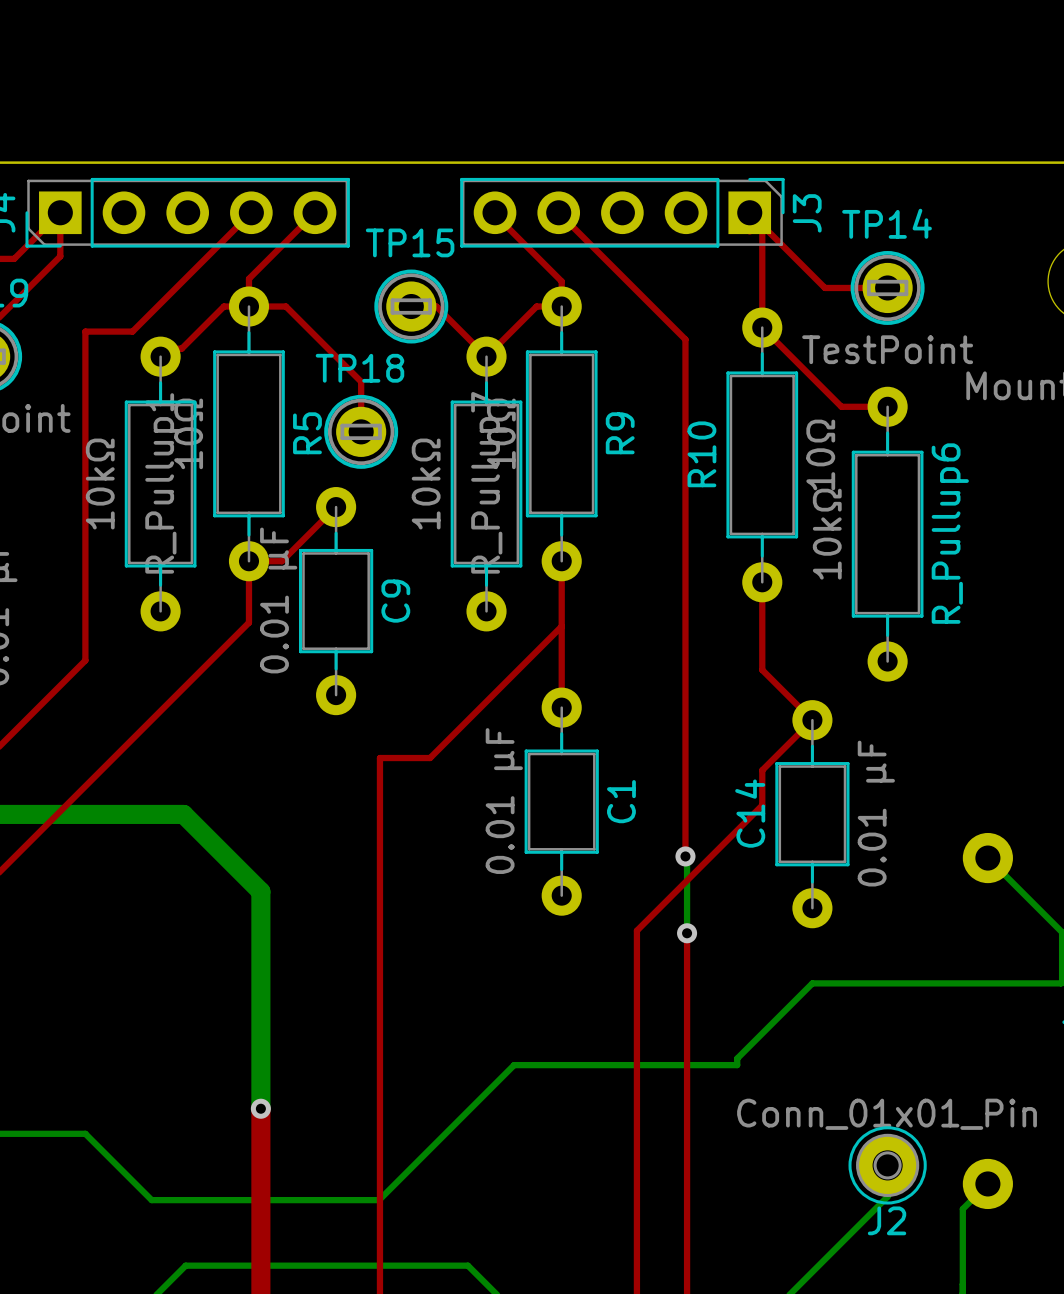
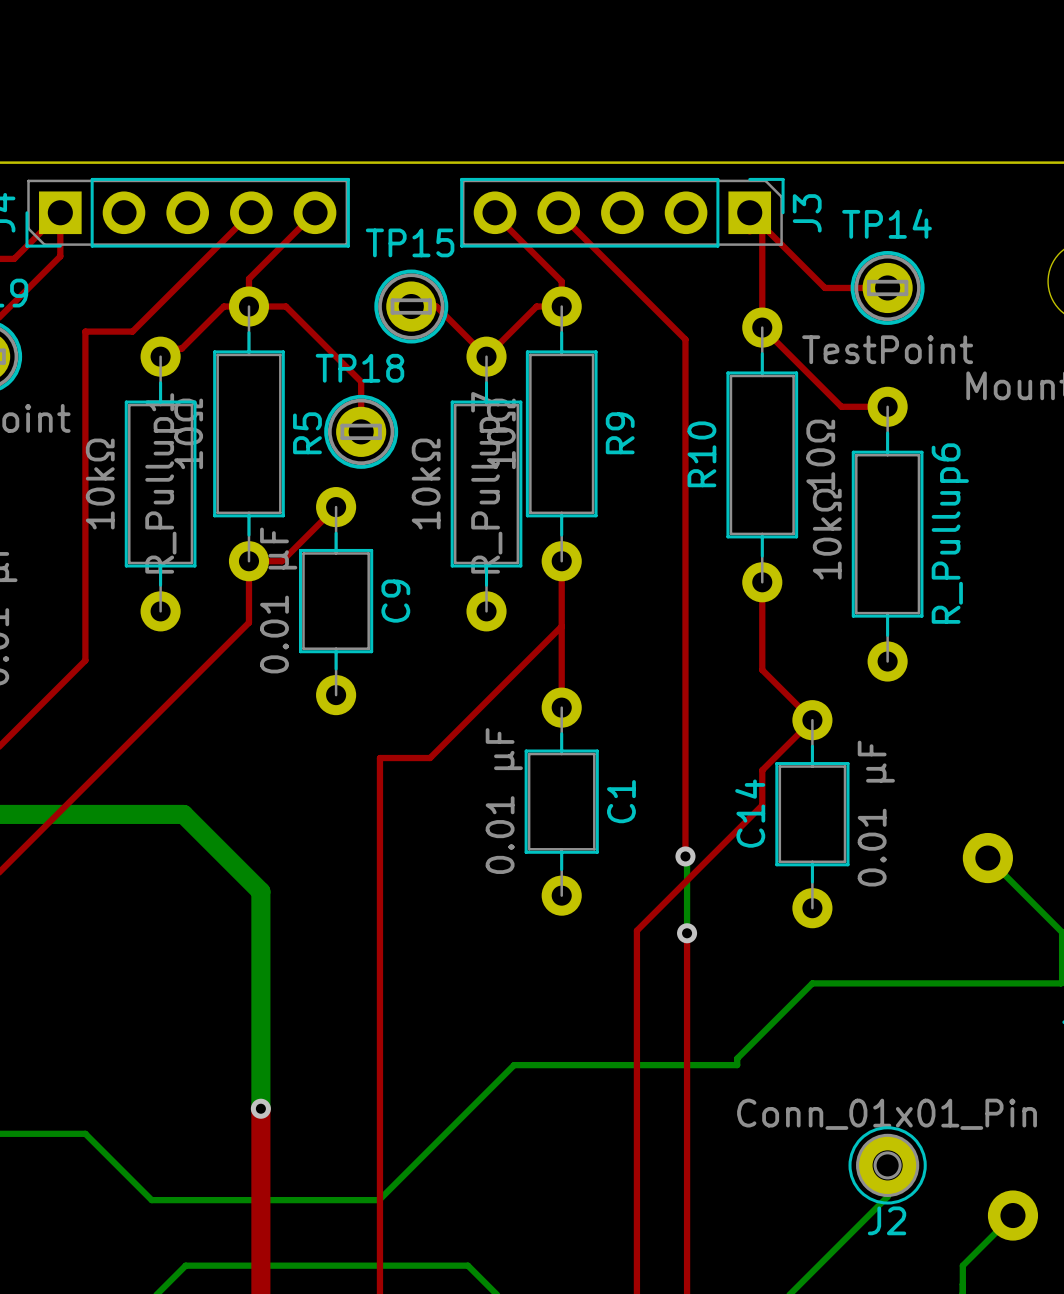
bottom track: (987, 1183) (962, 1209) (962, 1265) -> (1012, 1215) (962, 1265)
part position: (987, 1183) -> (1012, 1215)

